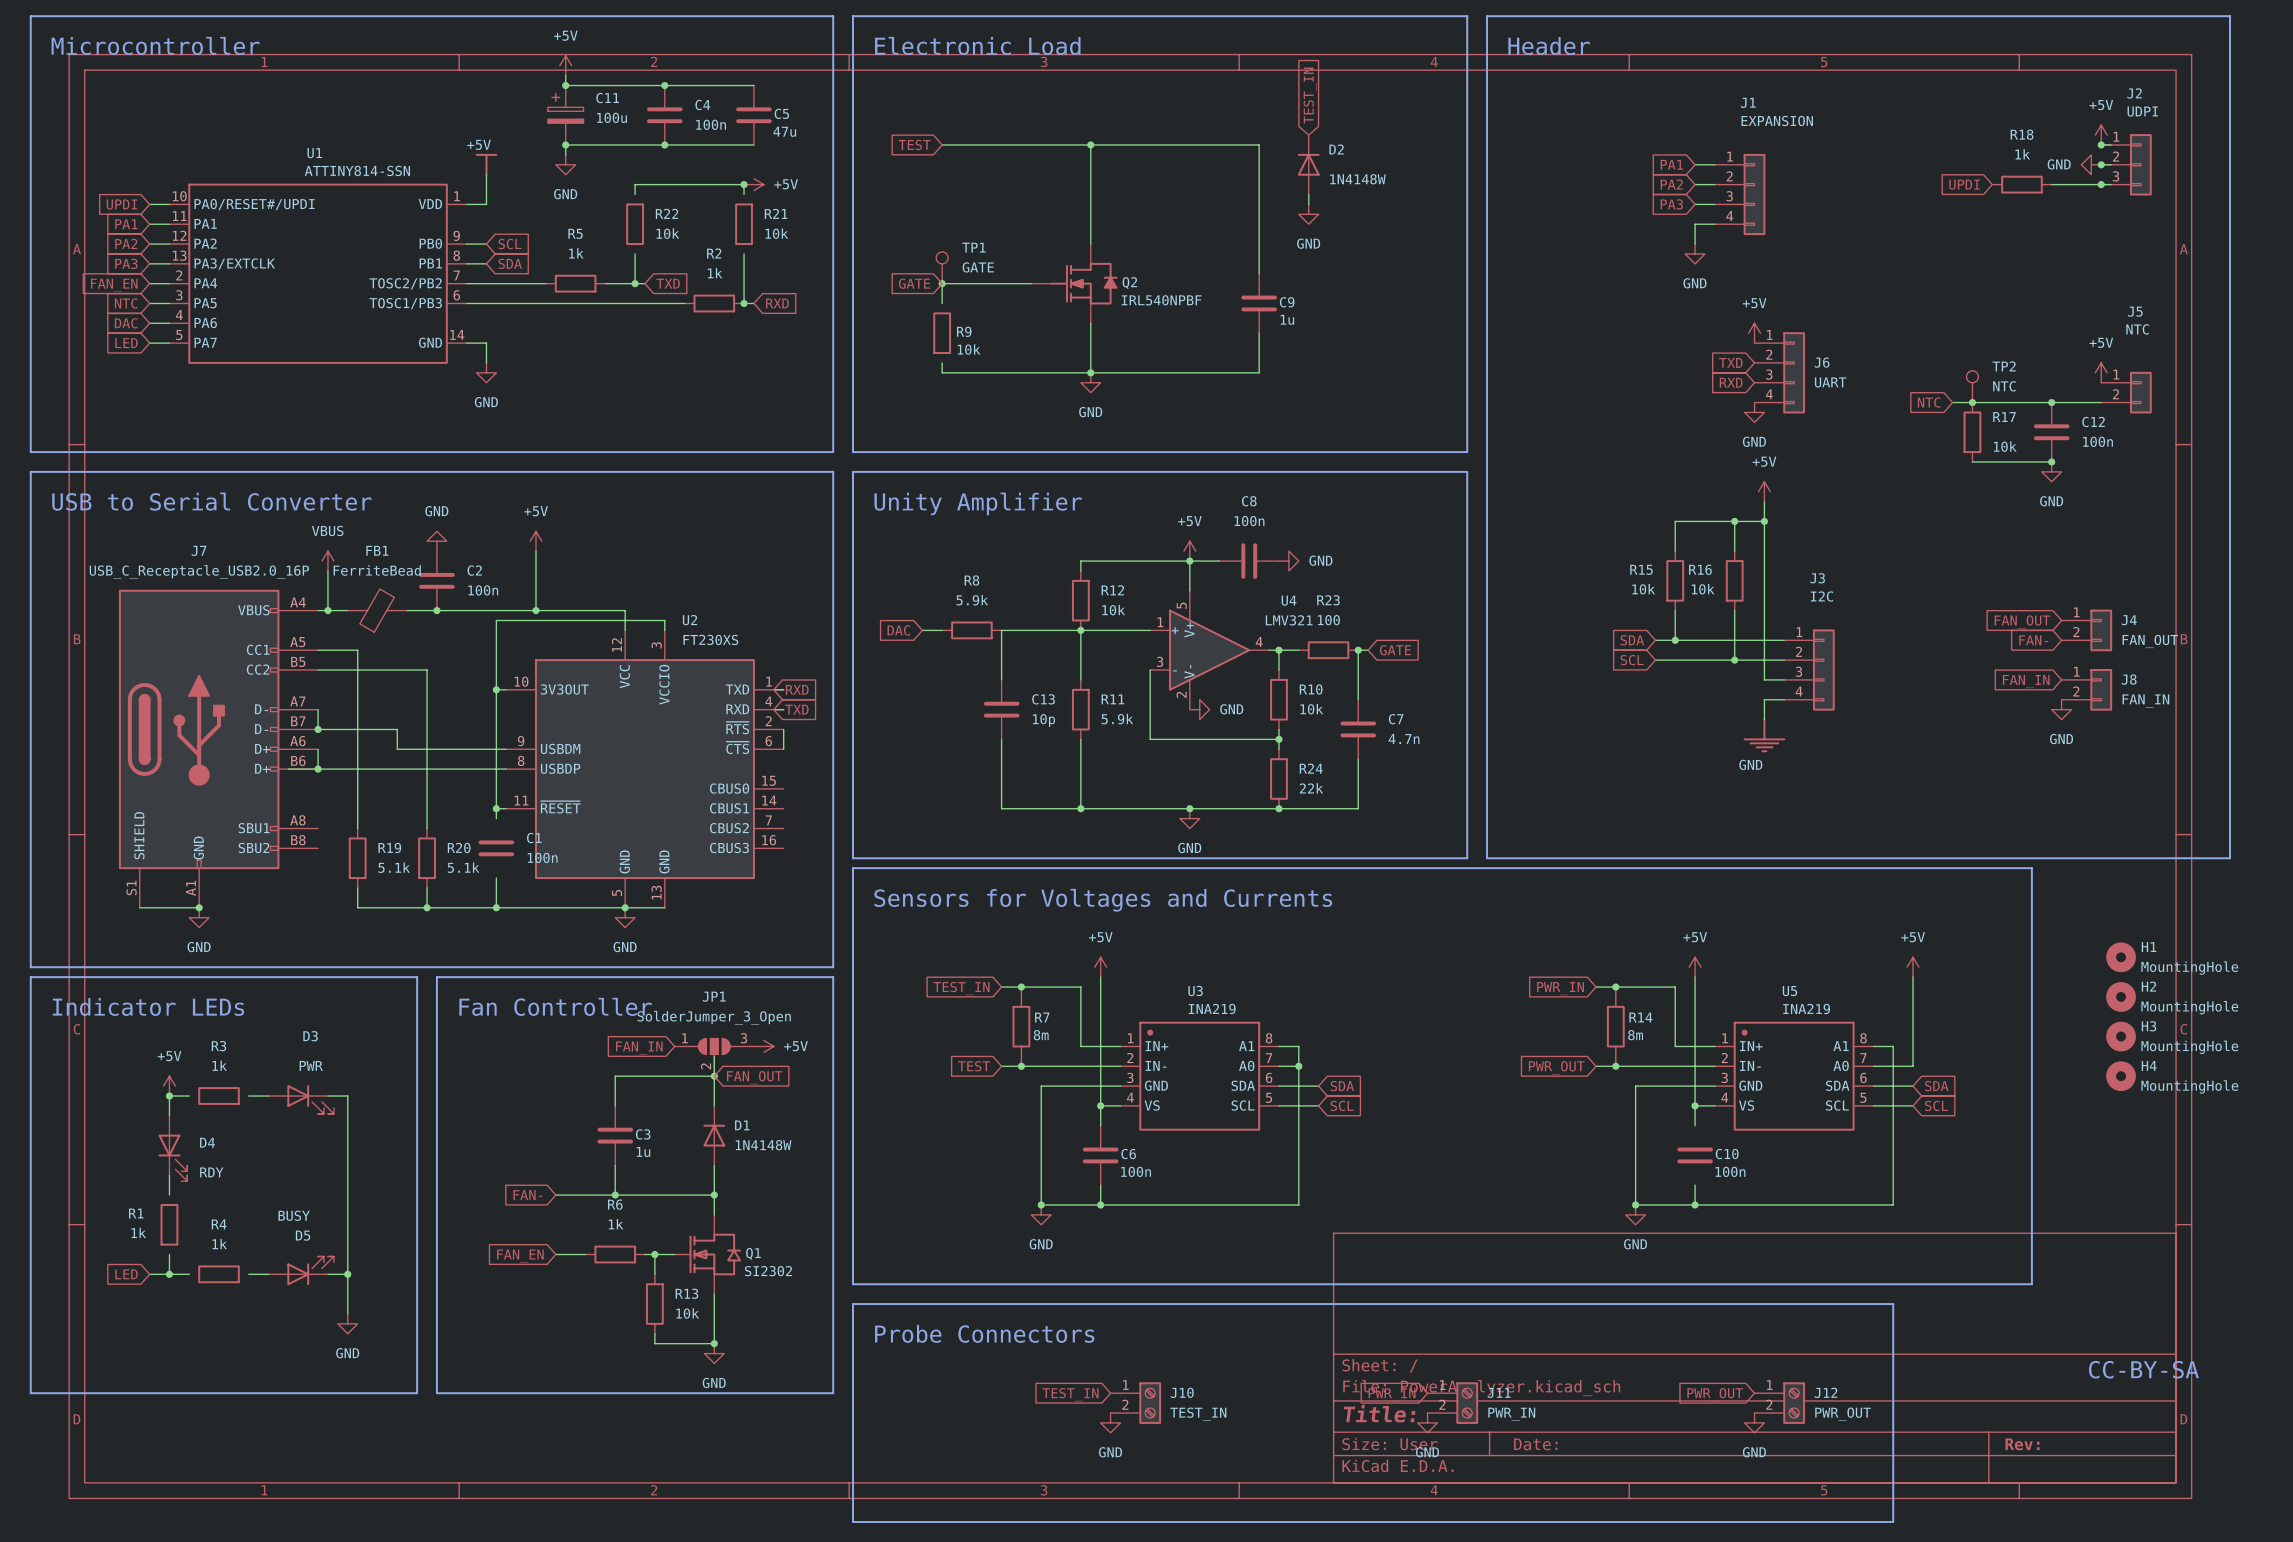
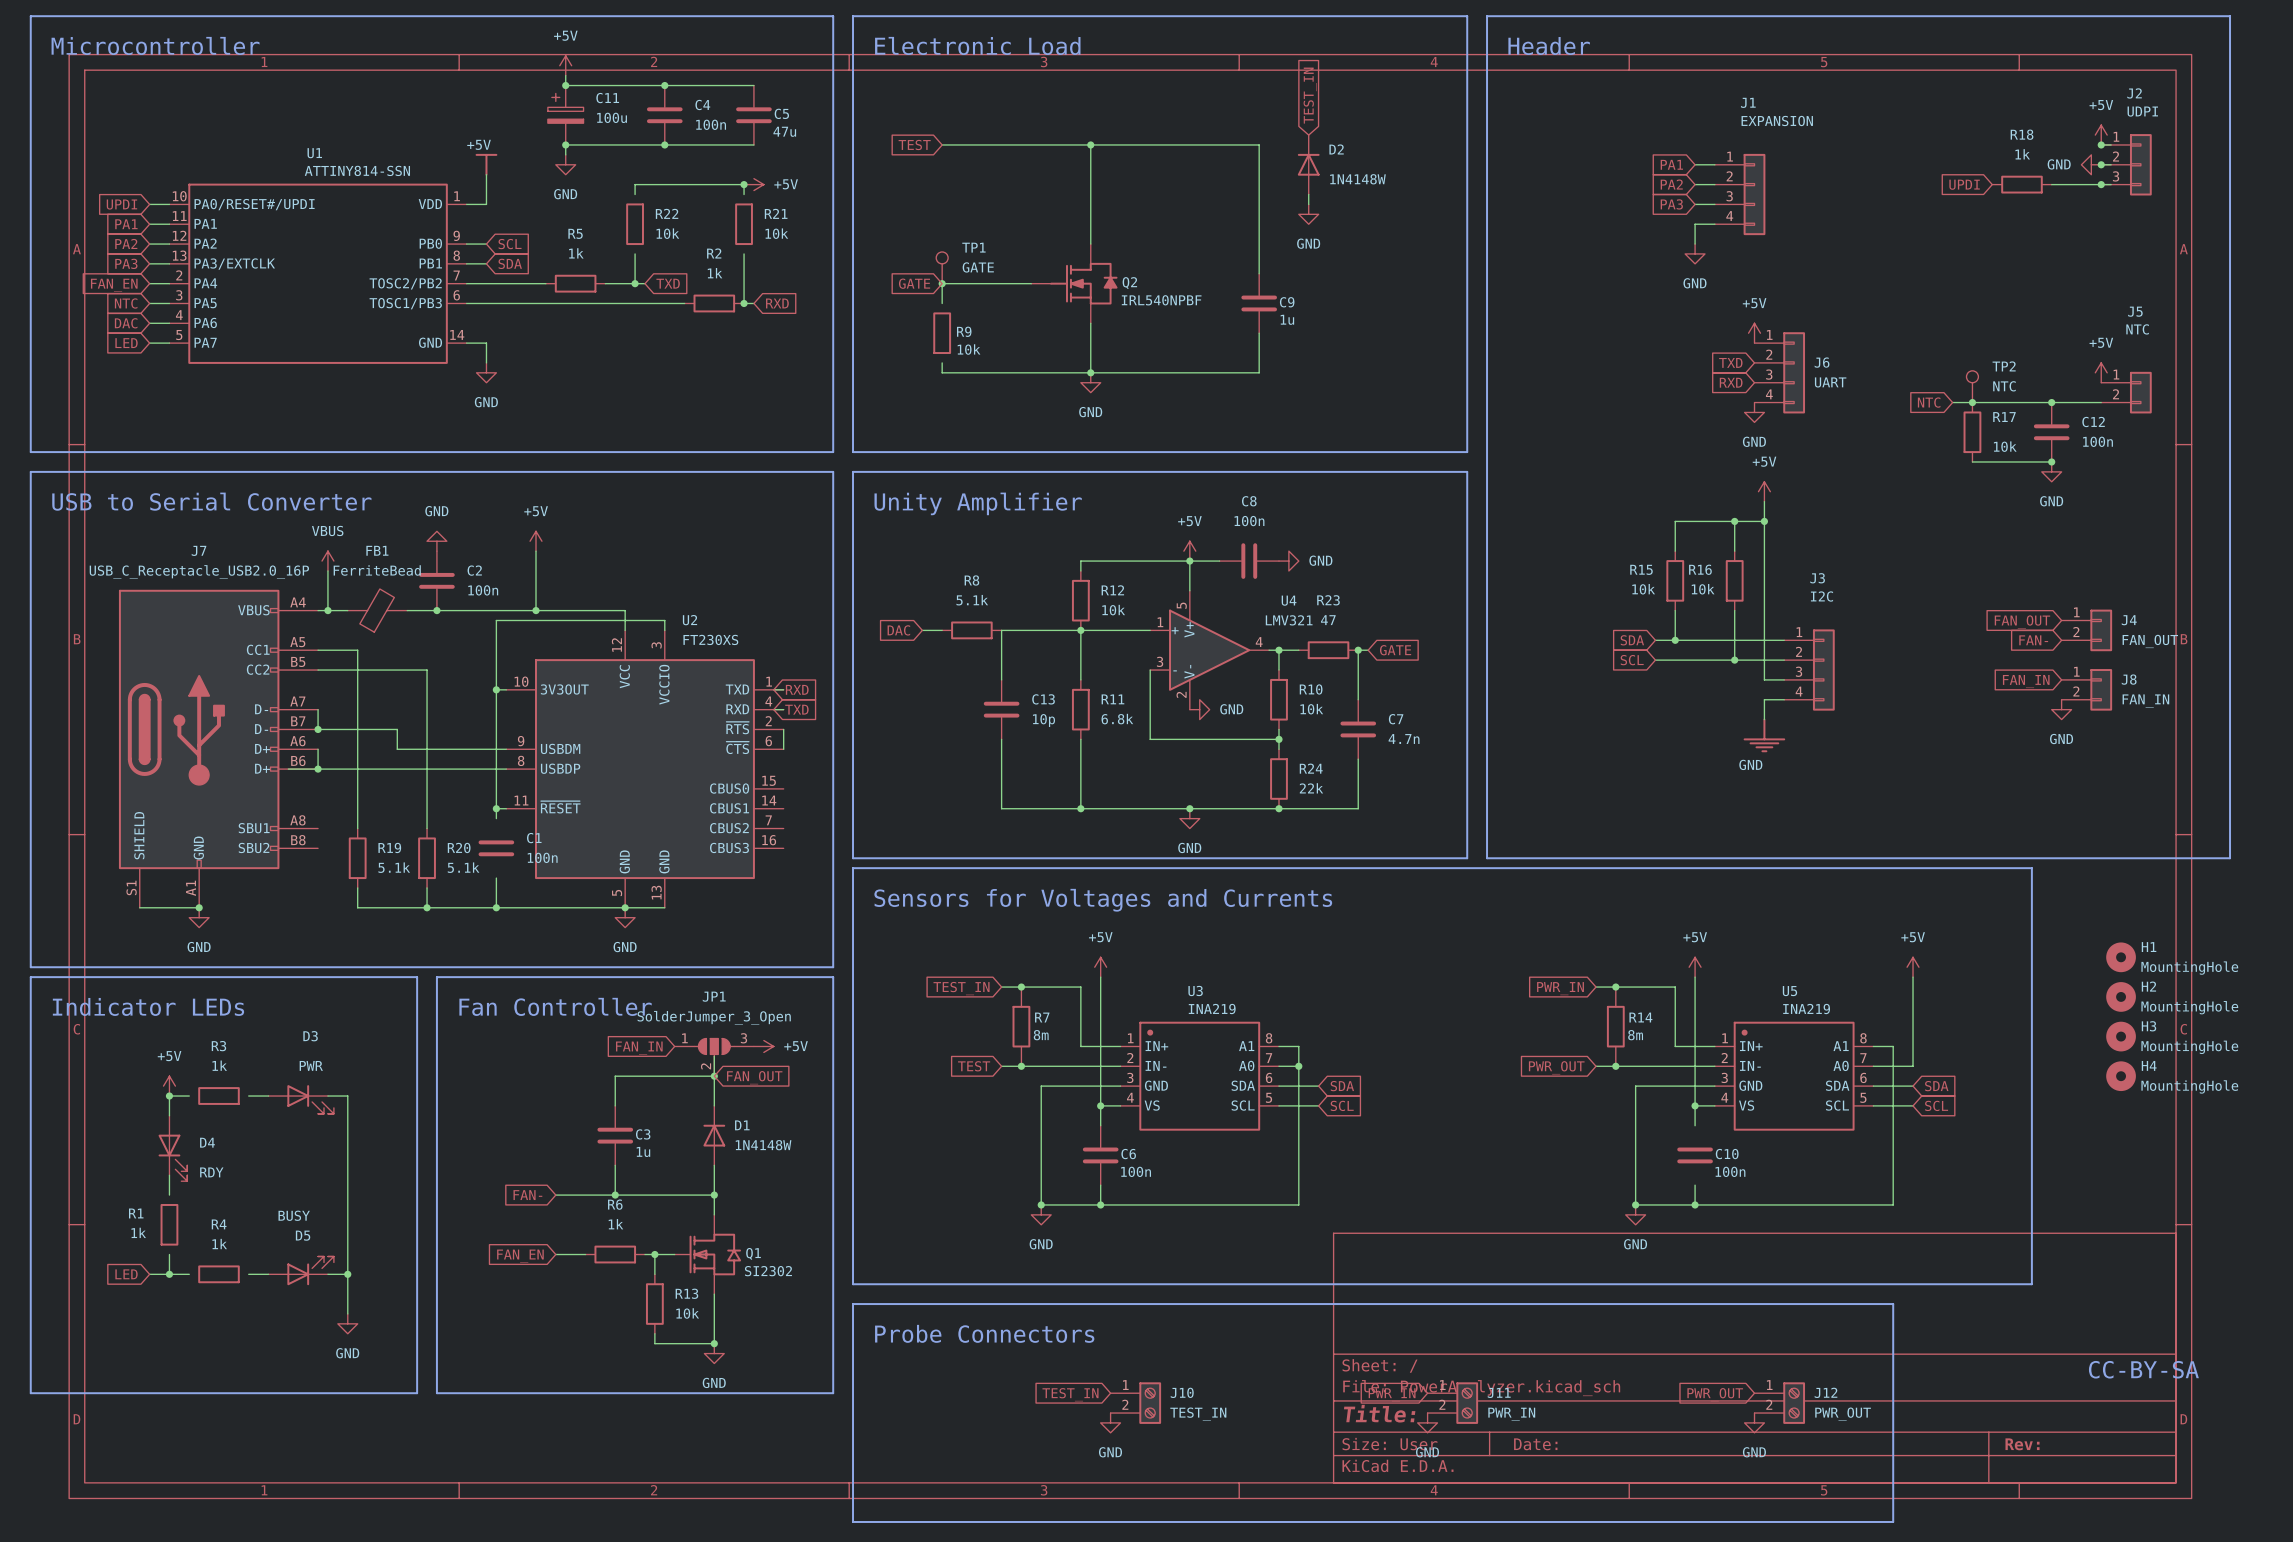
R8 value: 5.9k (972, 600) -> 5.1k (972, 600)
R23 value: 100 (1328, 620) -> 47 (1328, 620)
R11 value: 5.9k (1117, 719) -> 6.8k (1117, 719)

